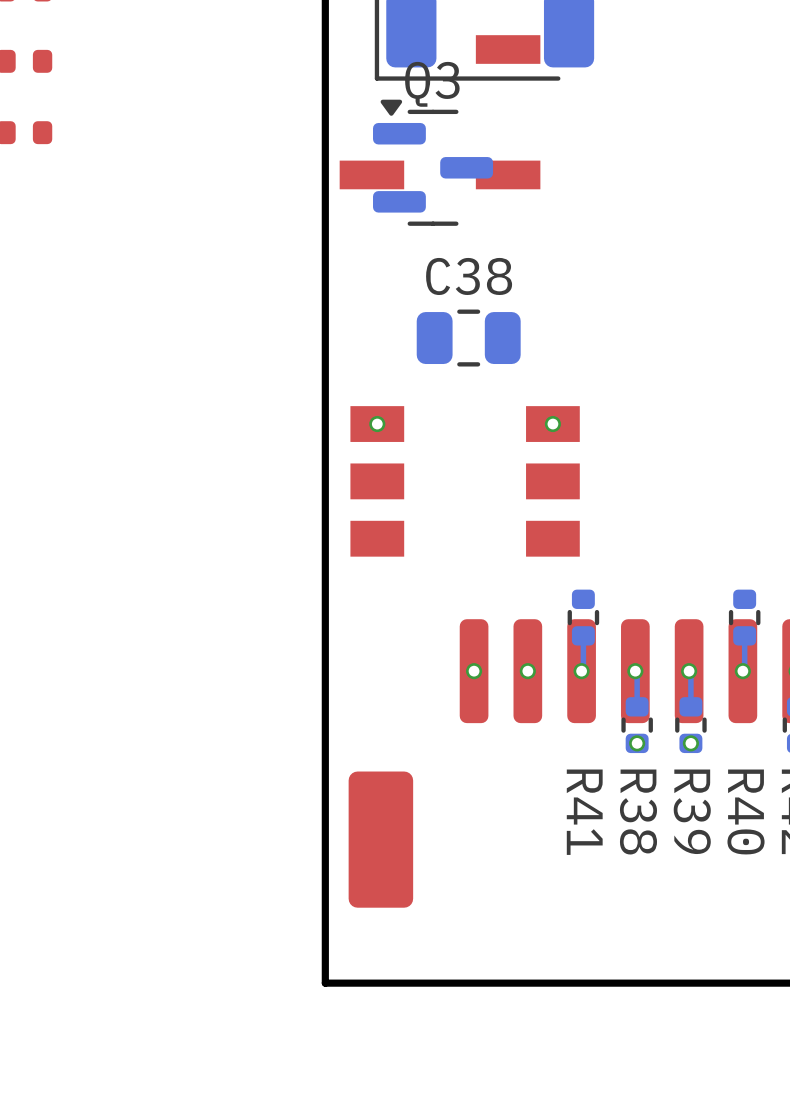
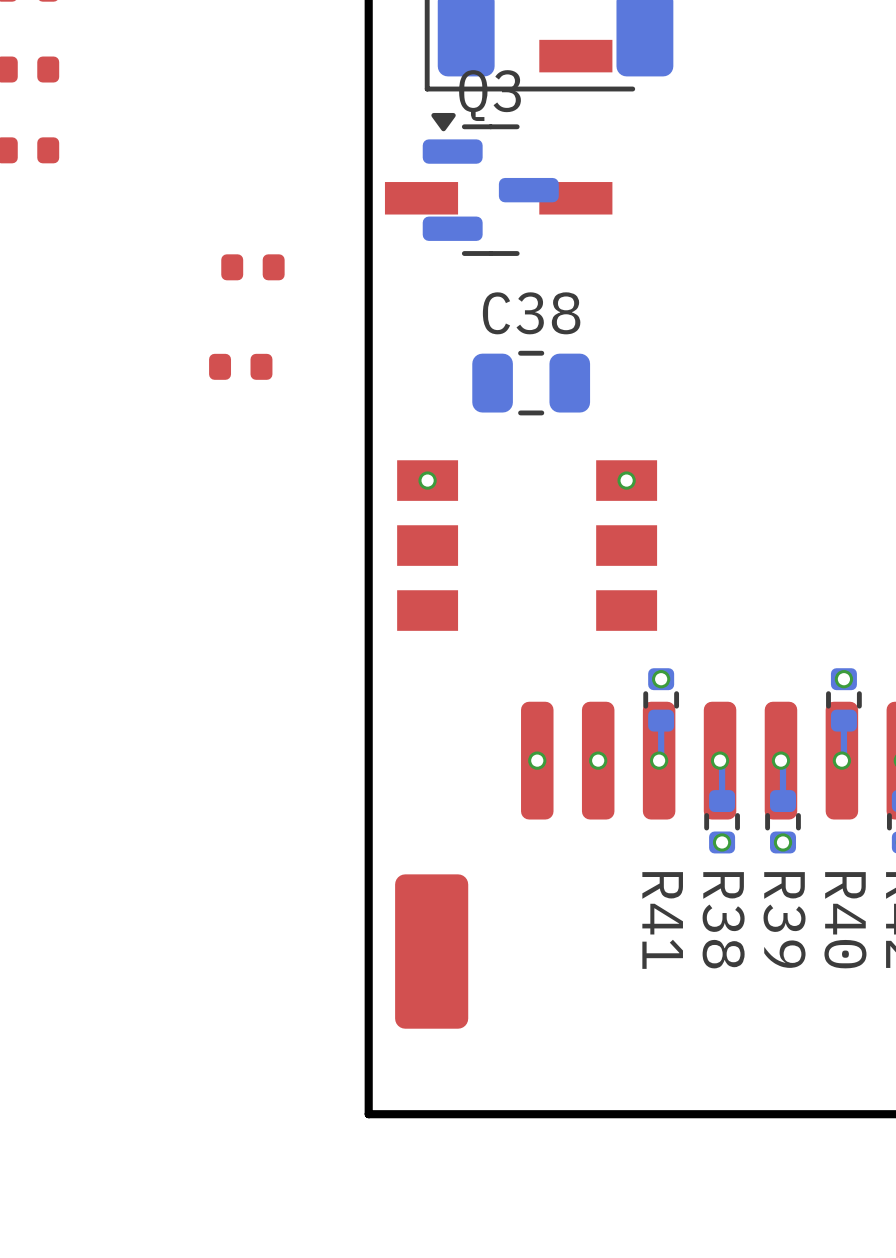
part: none -> (252, 267)
part: none -> (240, 366)
via: none -> (661, 679)
via: none -> (843, 679)

